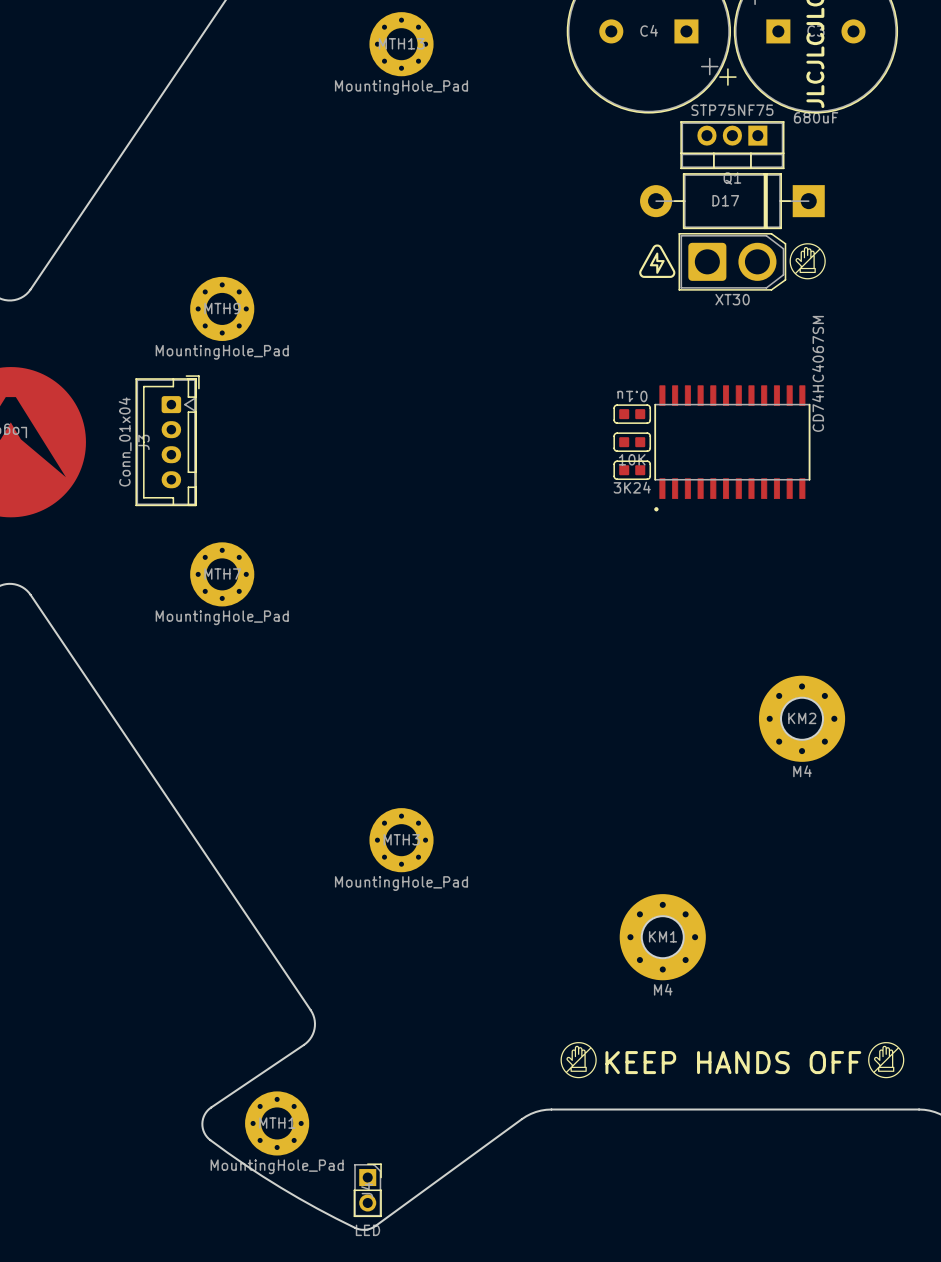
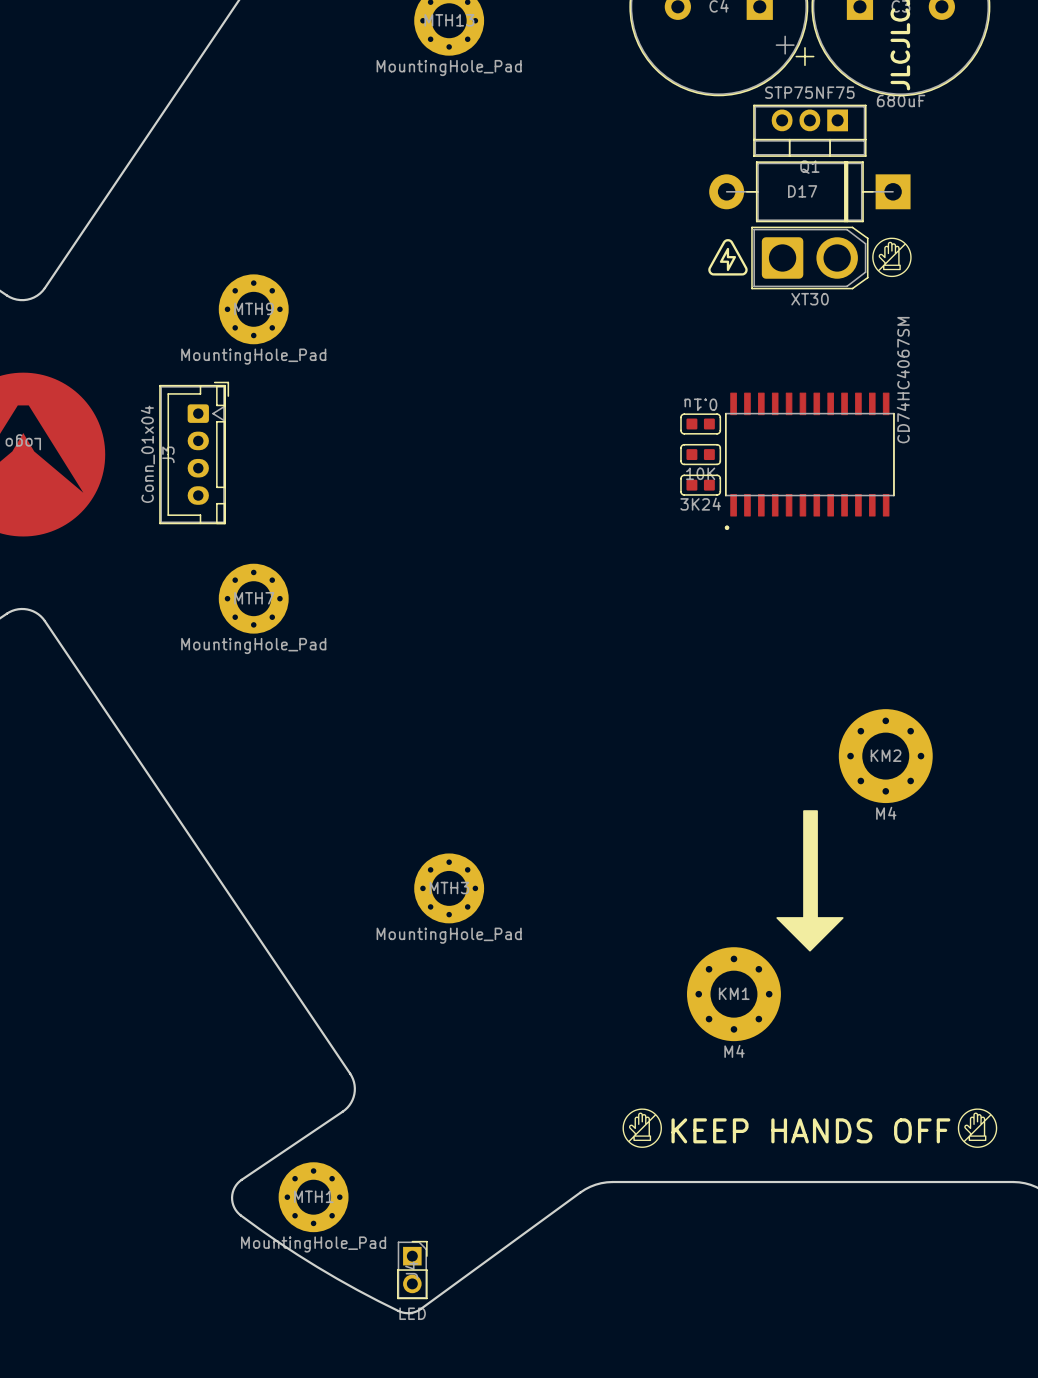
round board edge: [779, 696, 825, 741] -> none
drawing: none -> [776, 810, 844, 952]
round board edge: [640, 915, 685, 960] -> none

